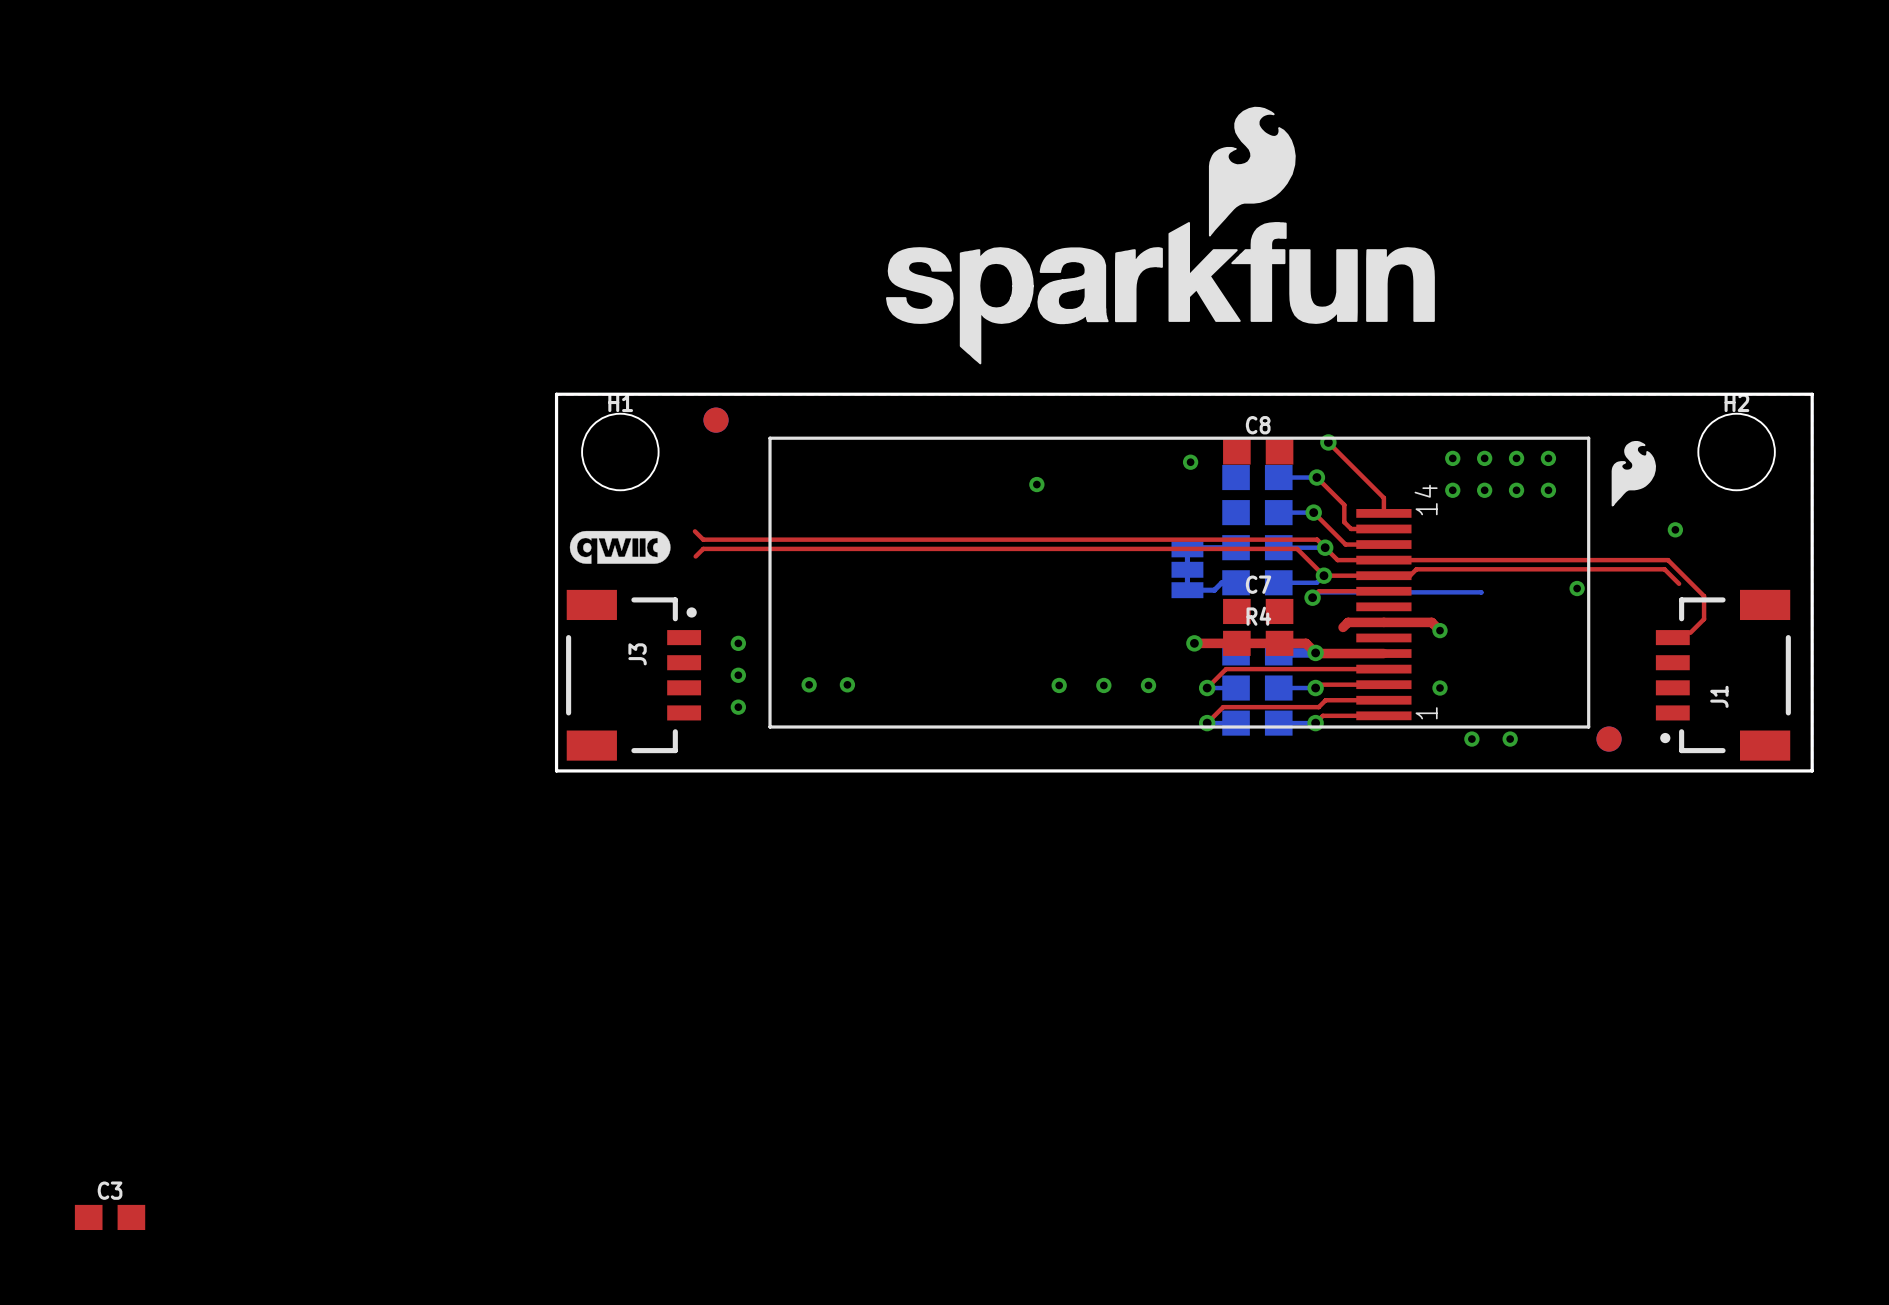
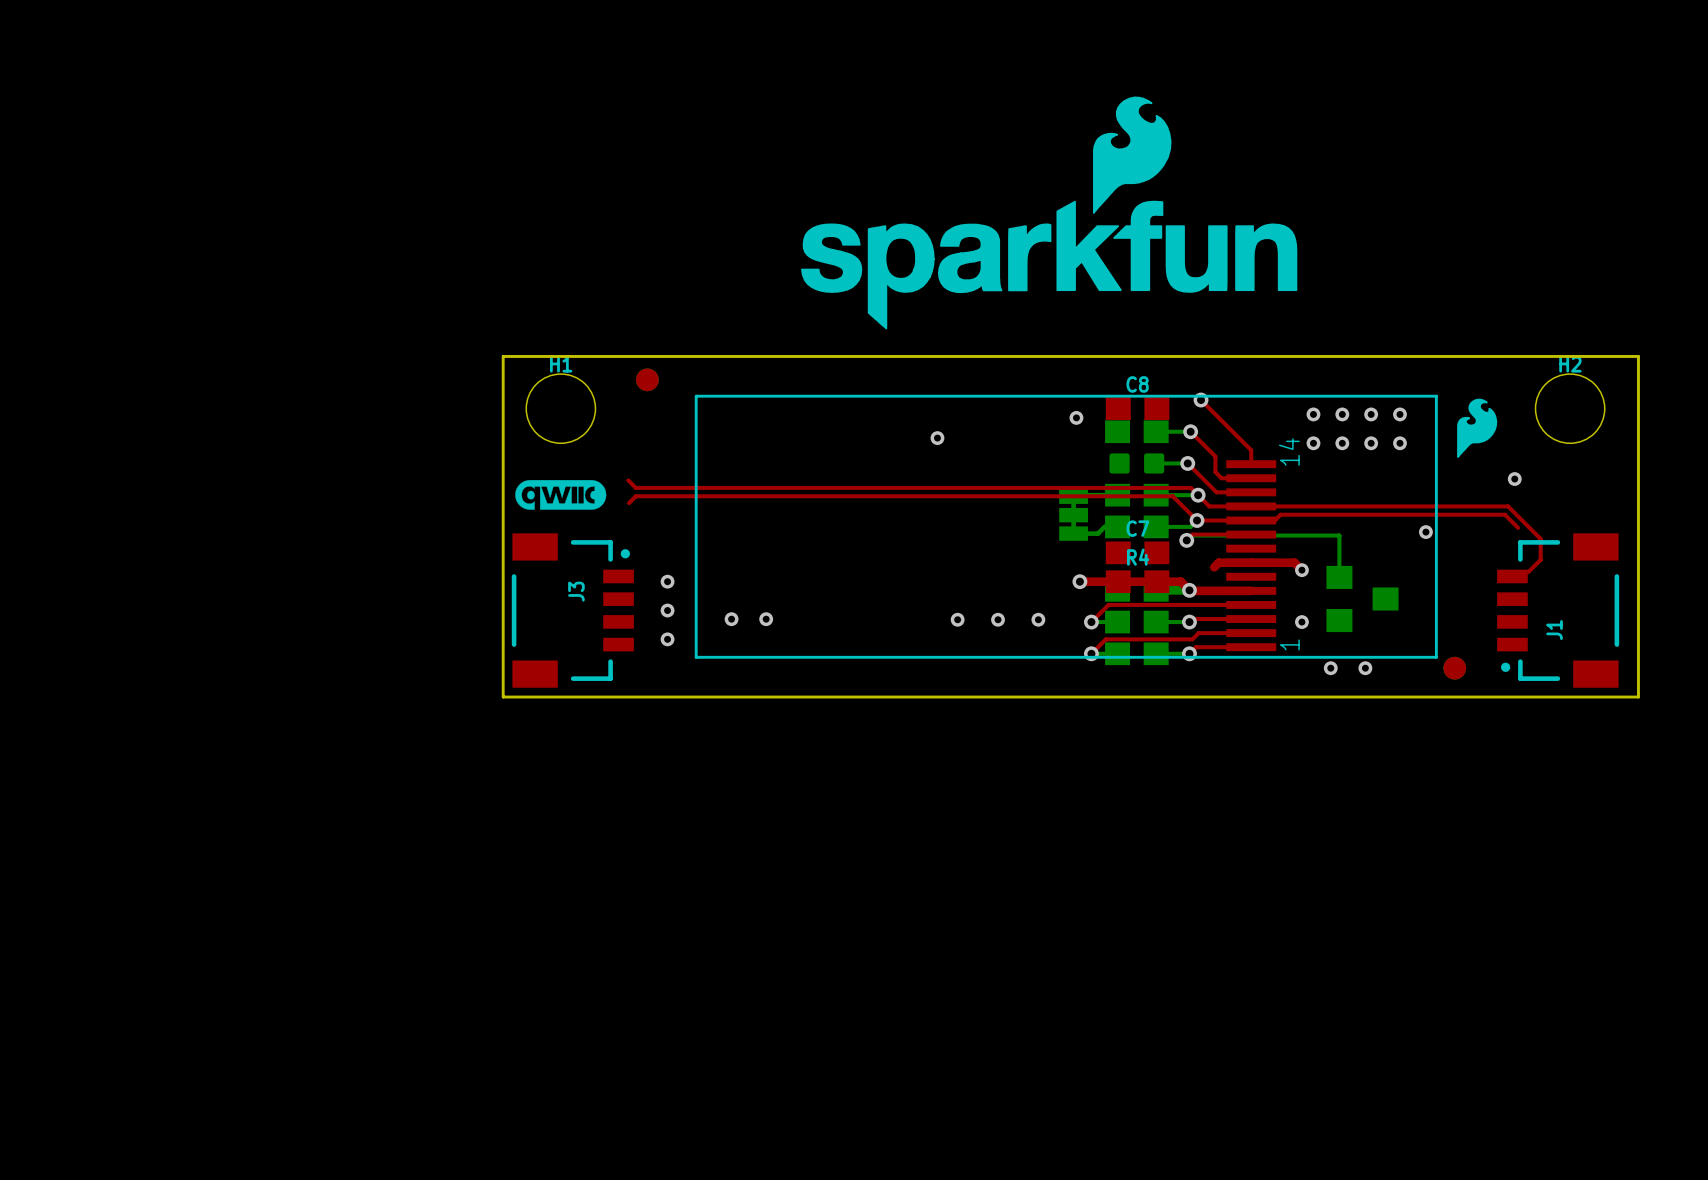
part footprint: [1222, 500, 1293, 526] -> [1109, 453, 1165, 474]
bottom track: none -> (1339, 535) (1339, 577)
part: none -> (1362, 598)
C3: (110, 1217) -> none

